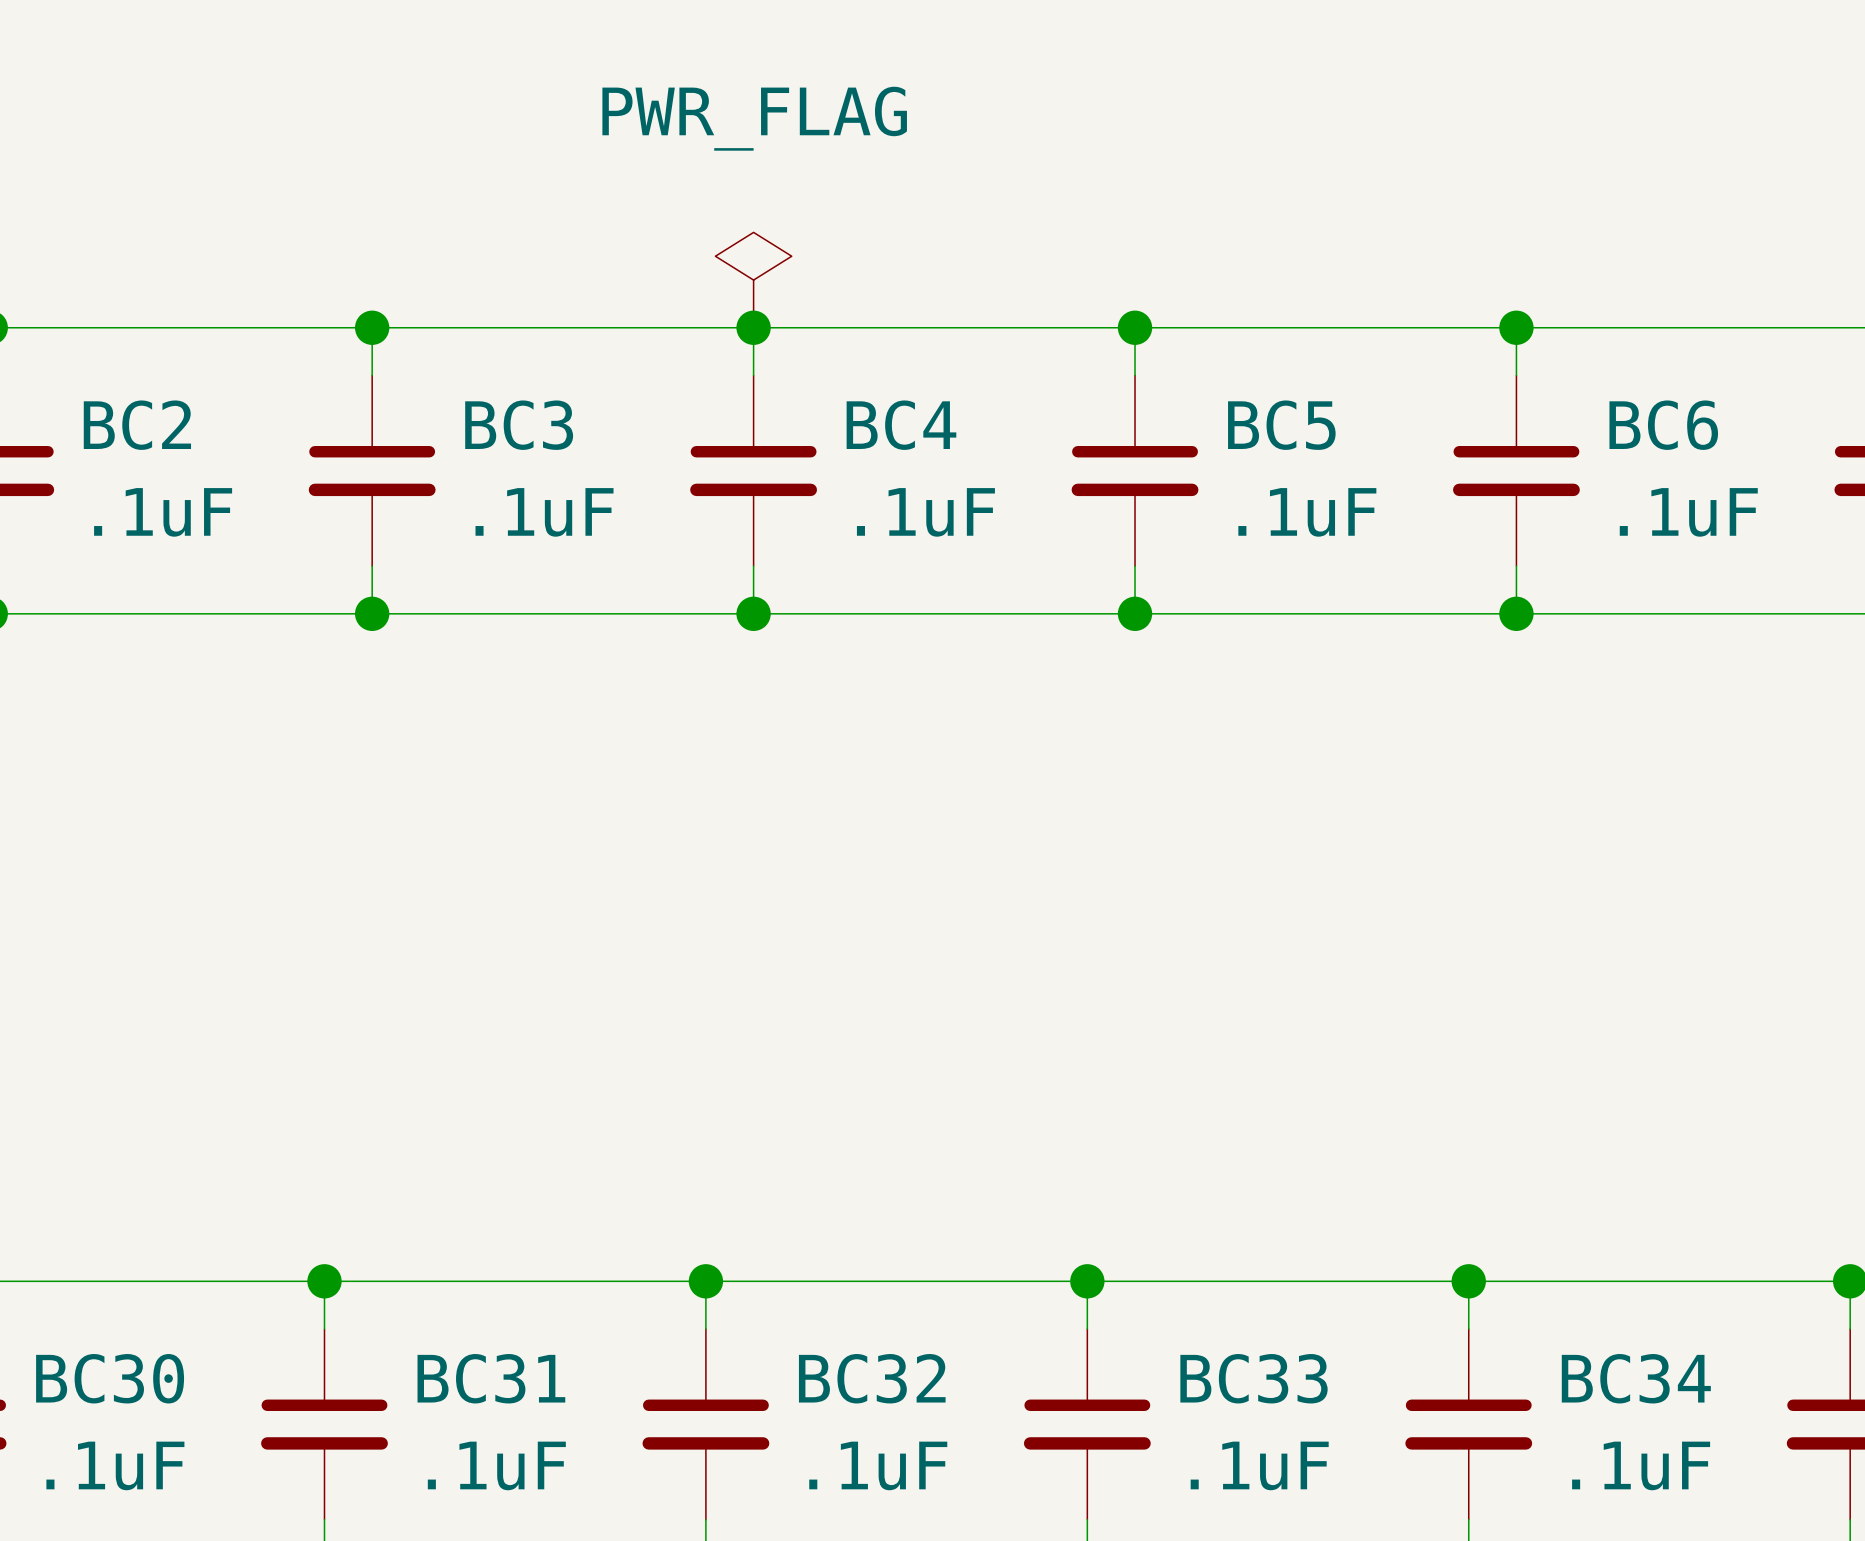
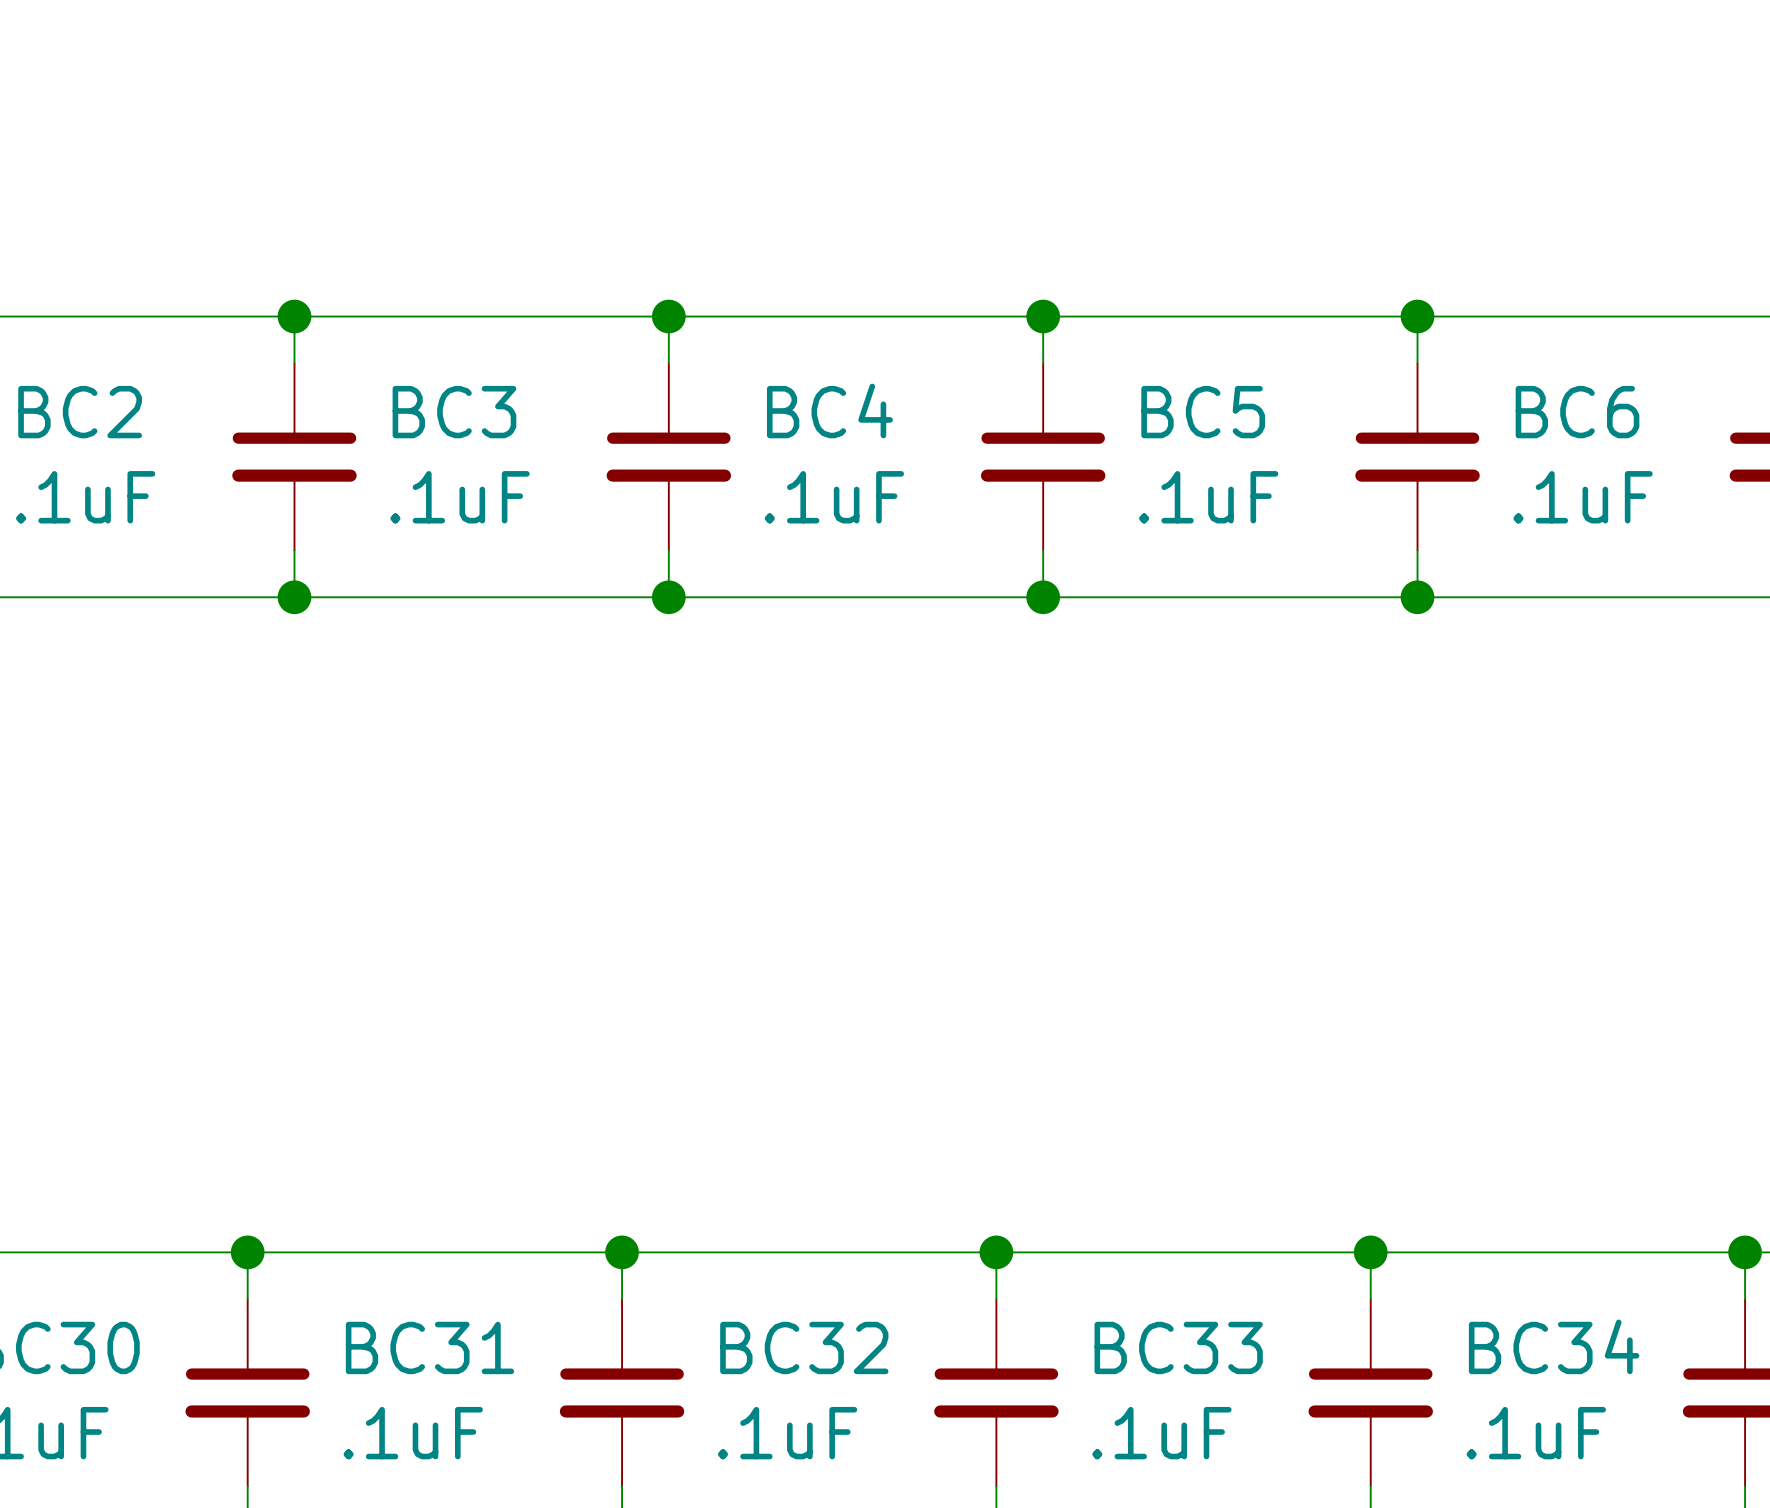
power symbol: PWR_FLAG (753, 280) -> none

